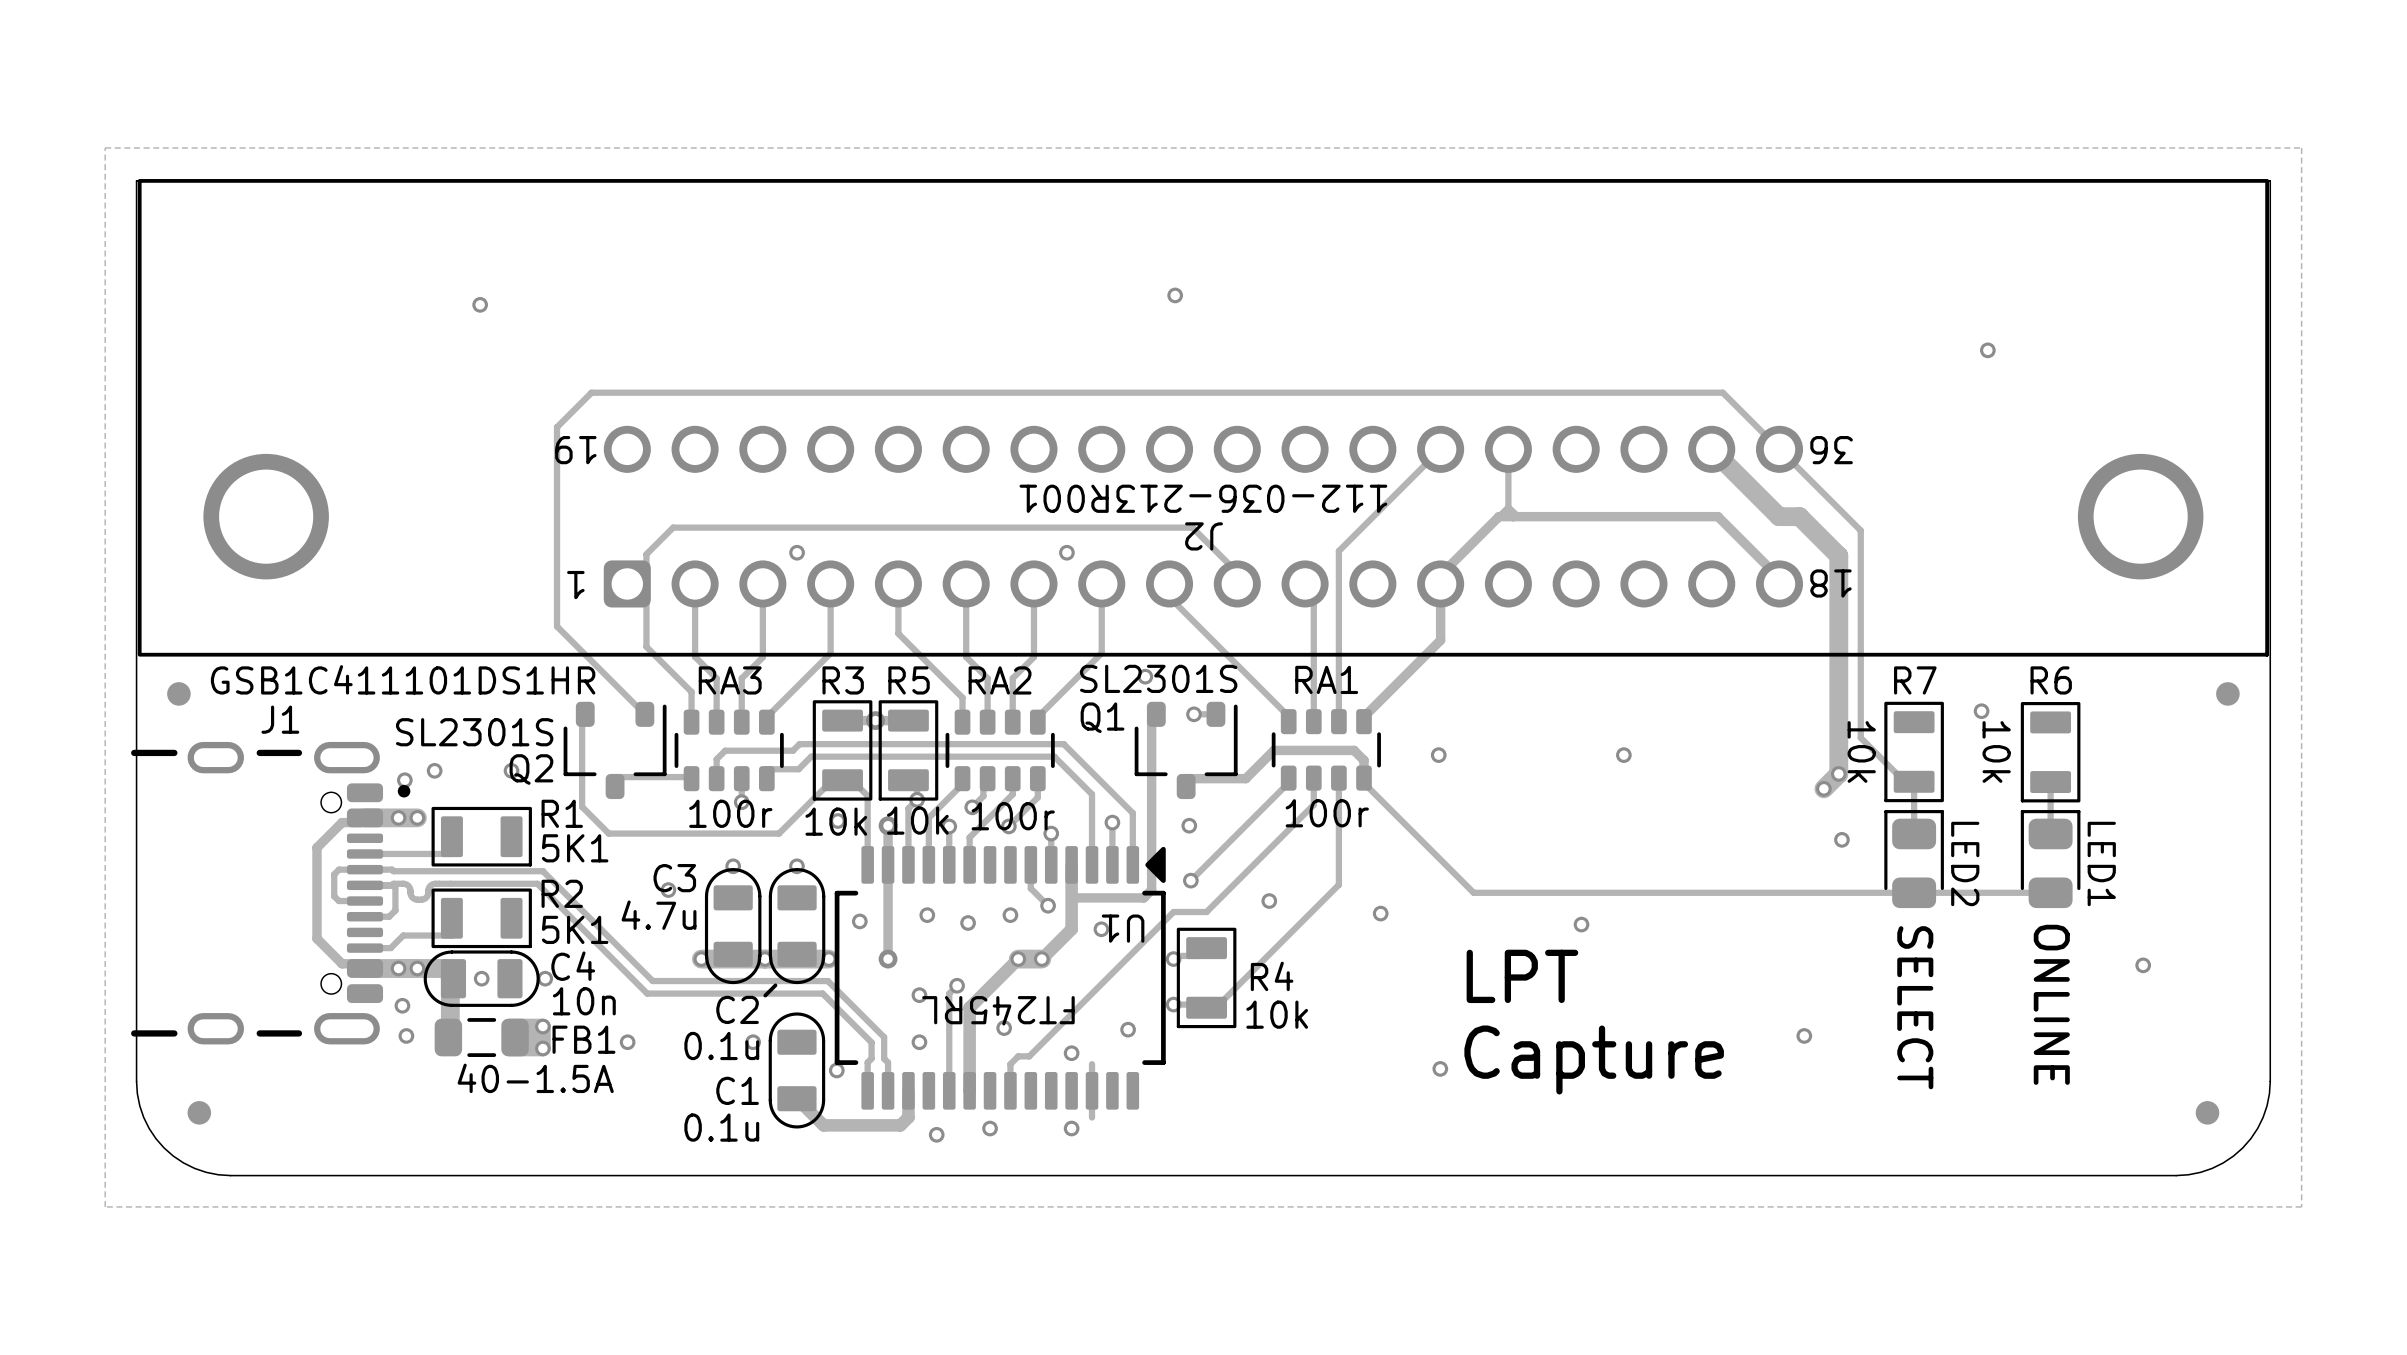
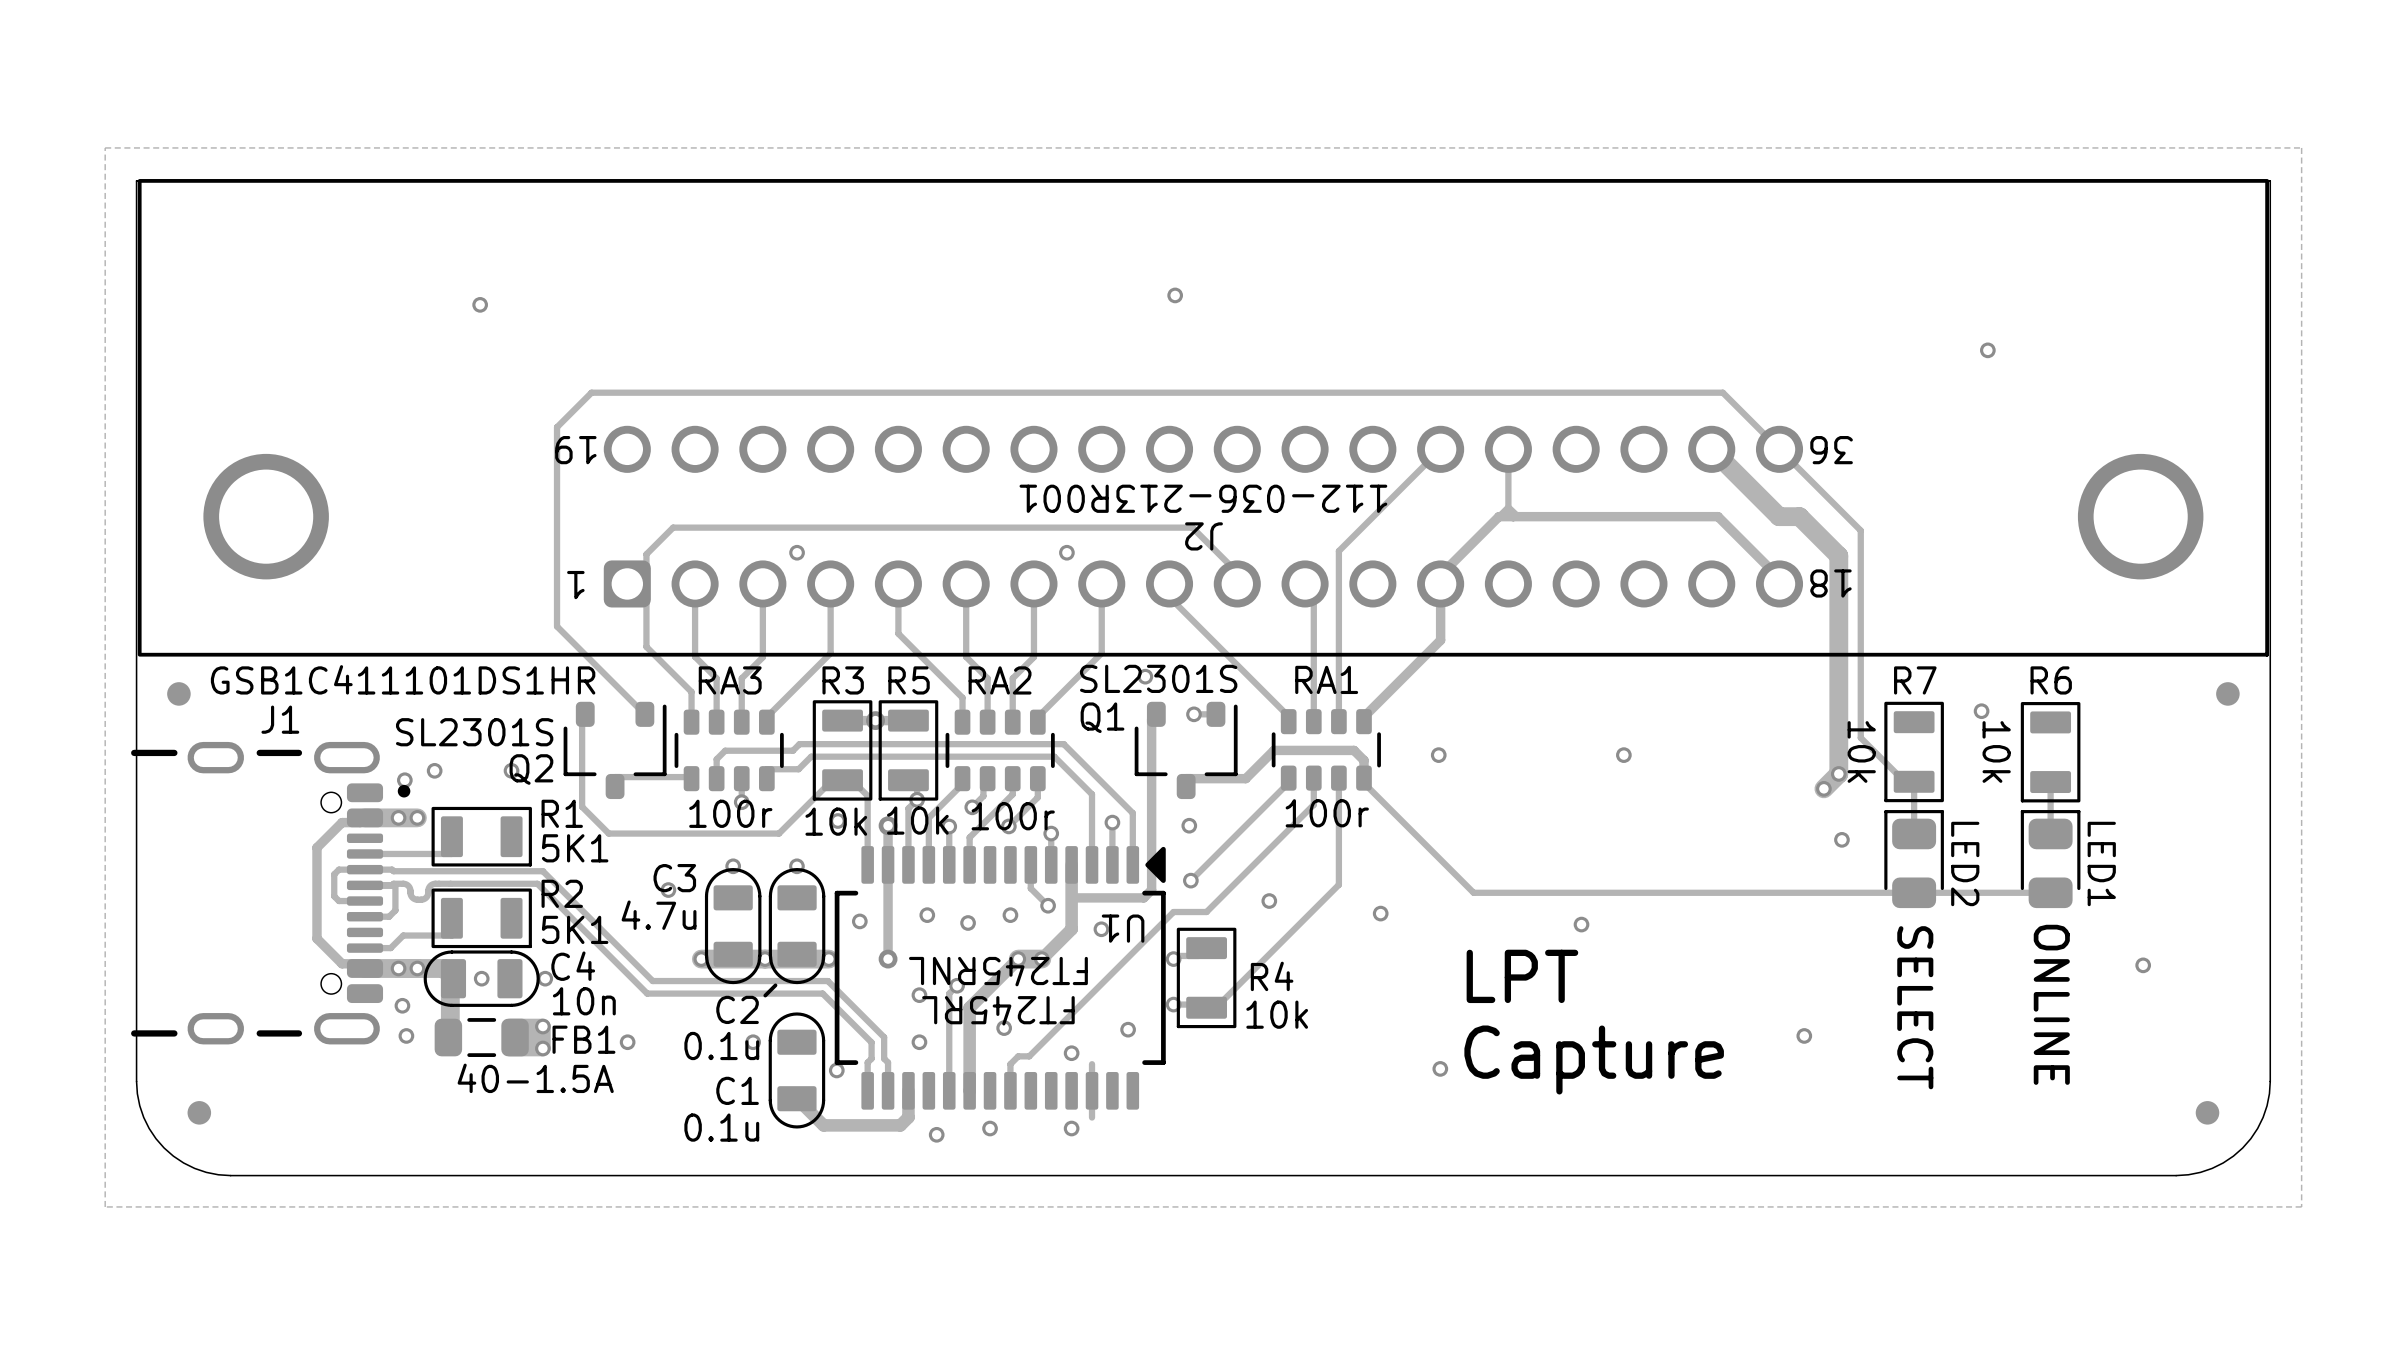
U1 text: none -> FT245RNL (998, 971)

